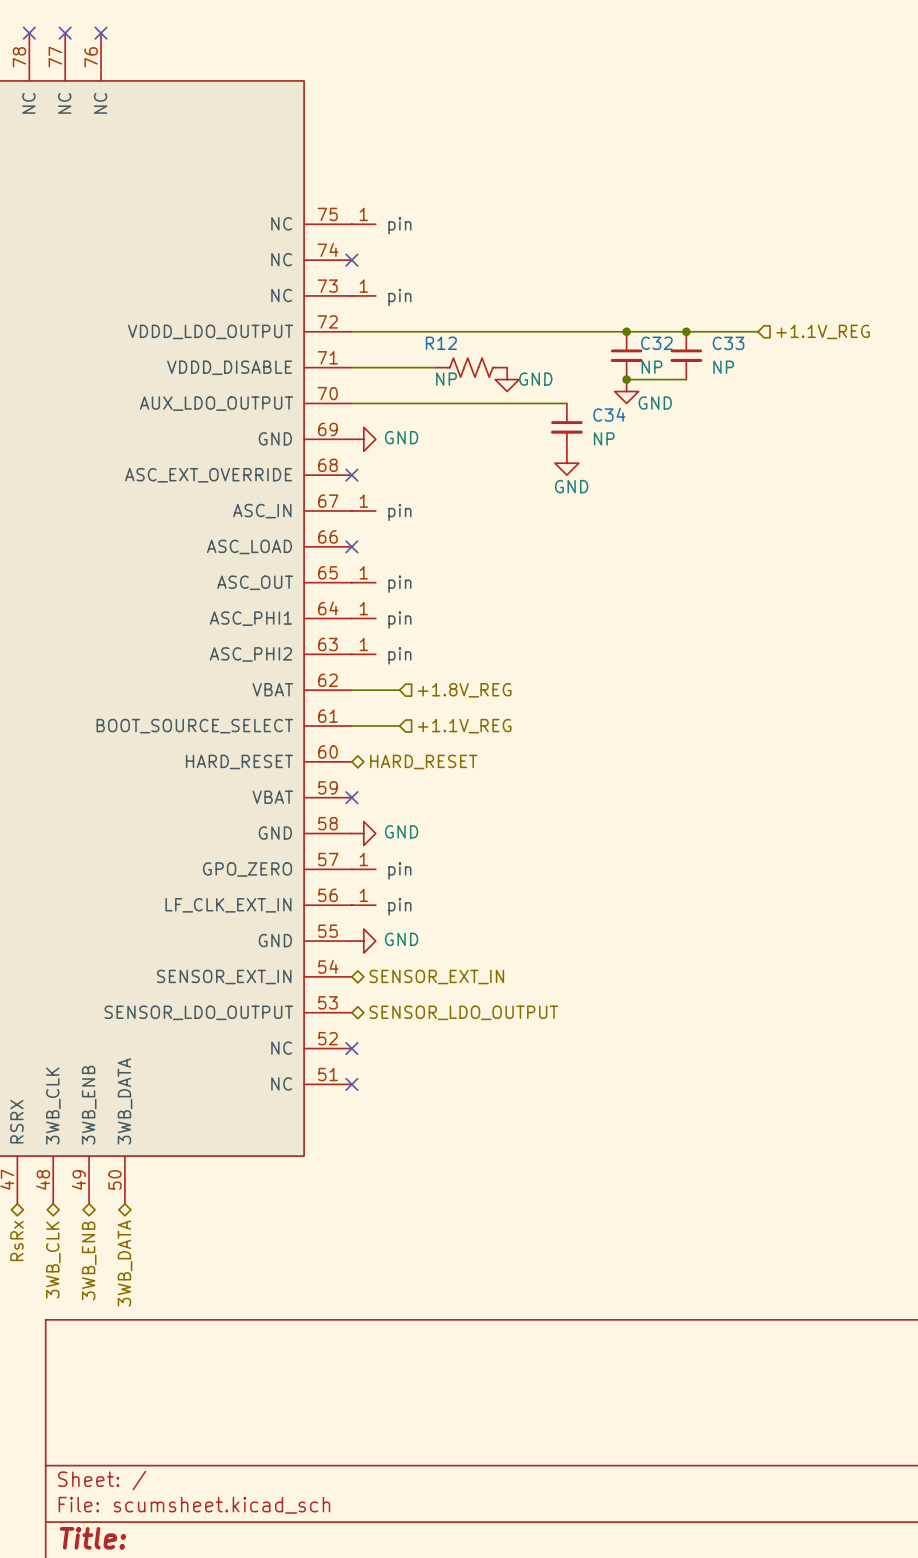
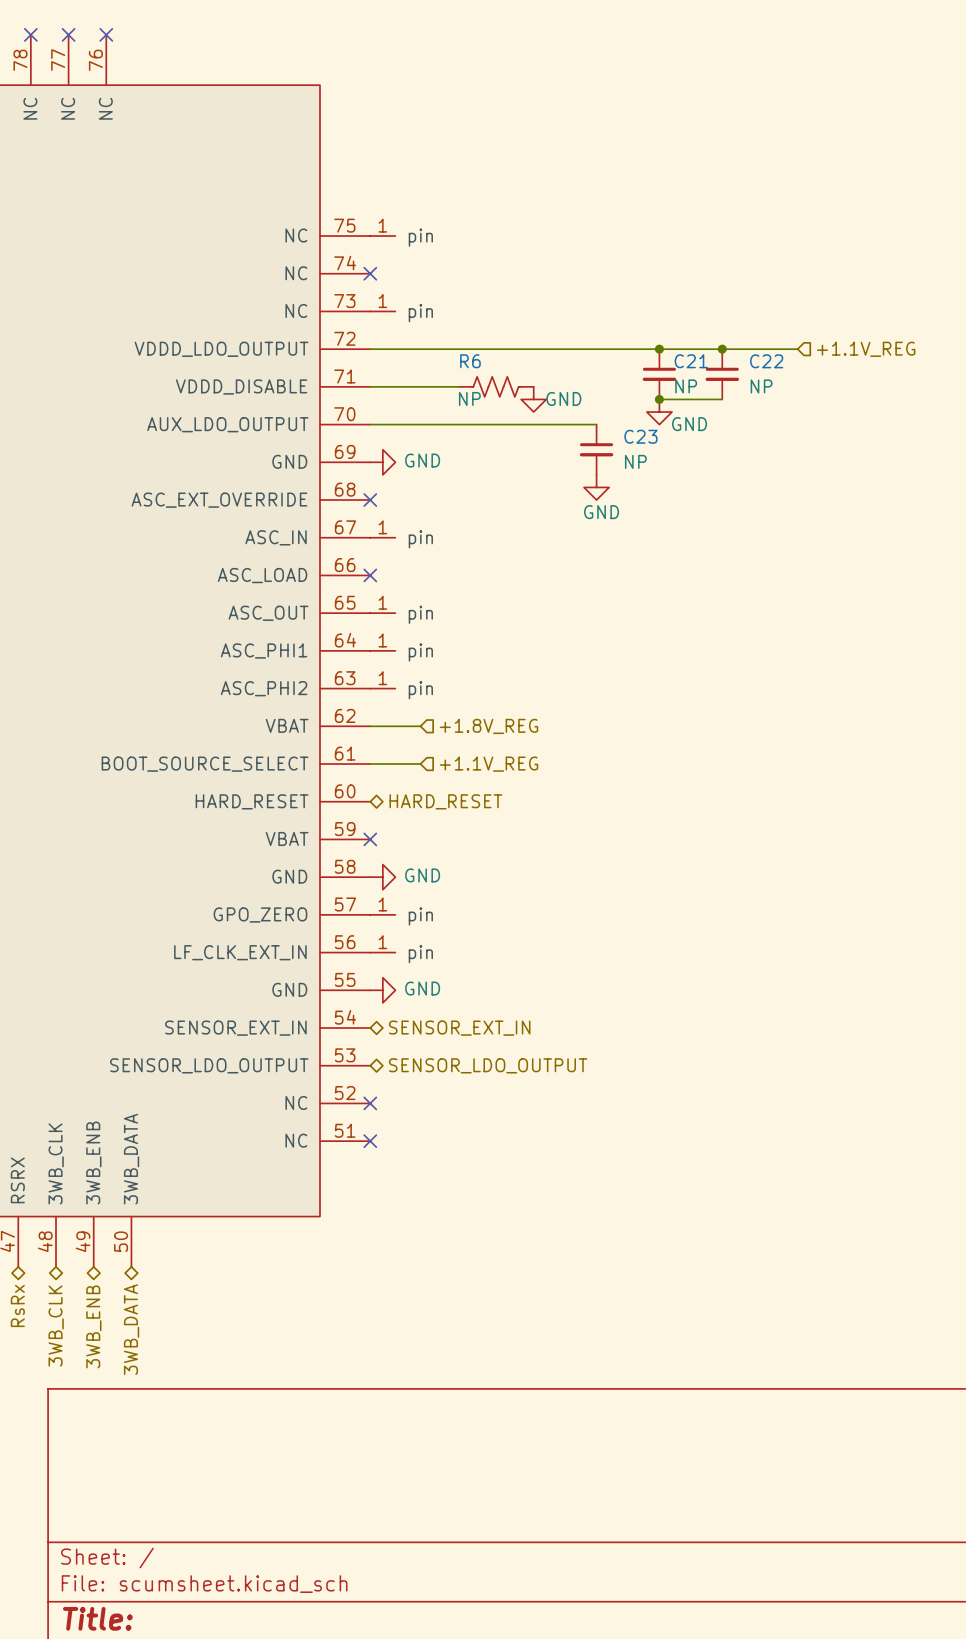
R12 name: R12 (441, 343) -> R6 (470, 361)
C32 name: C32 (656, 343) -> C21 (691, 361)
C33 name: C33 (728, 343) -> C22 (766, 361)
C34 name: C34 (609, 414) -> C23 (640, 436)

